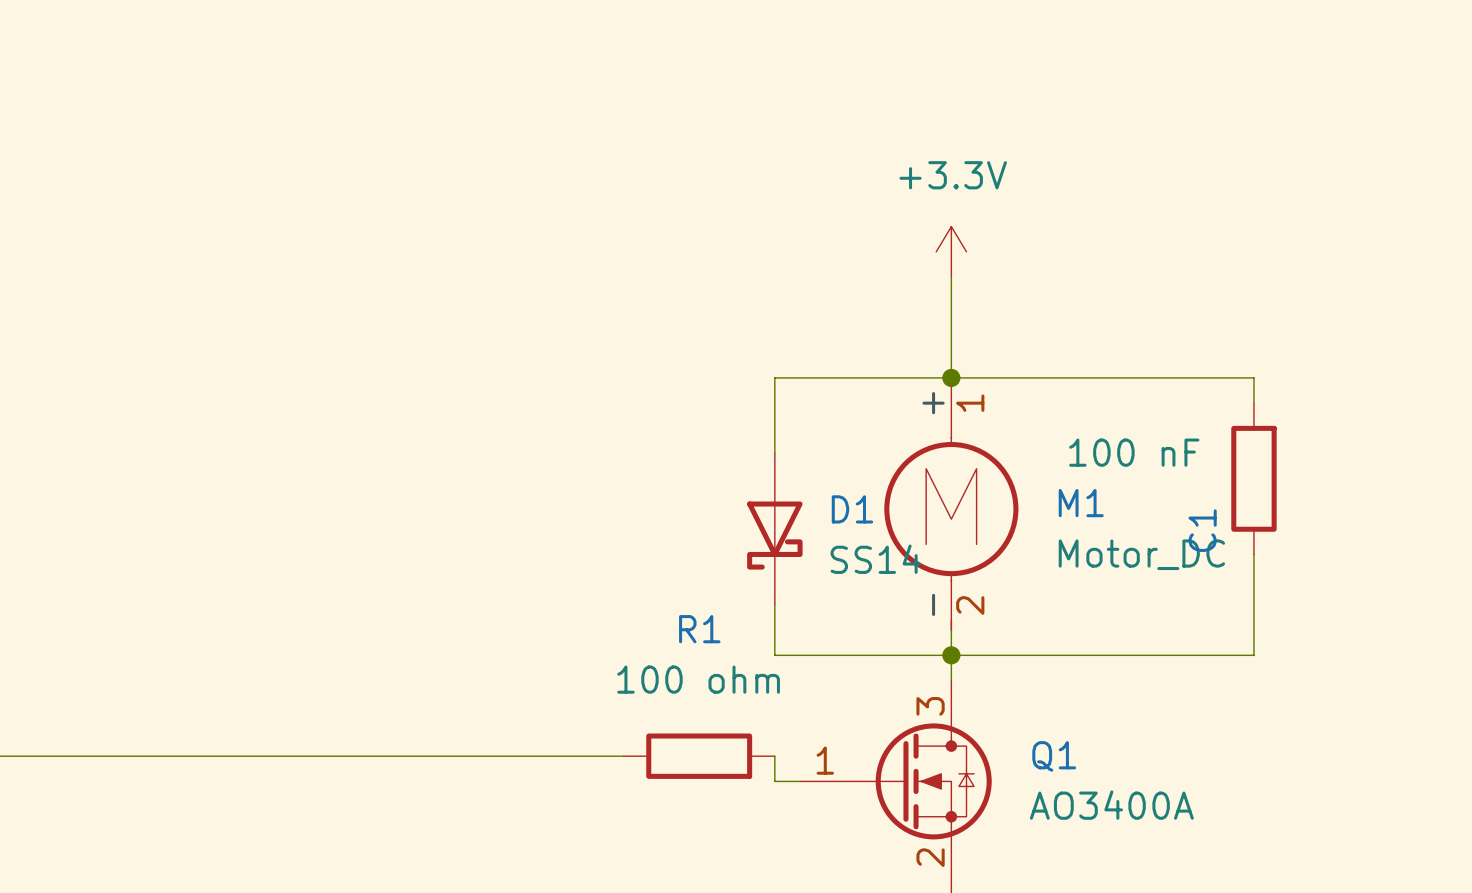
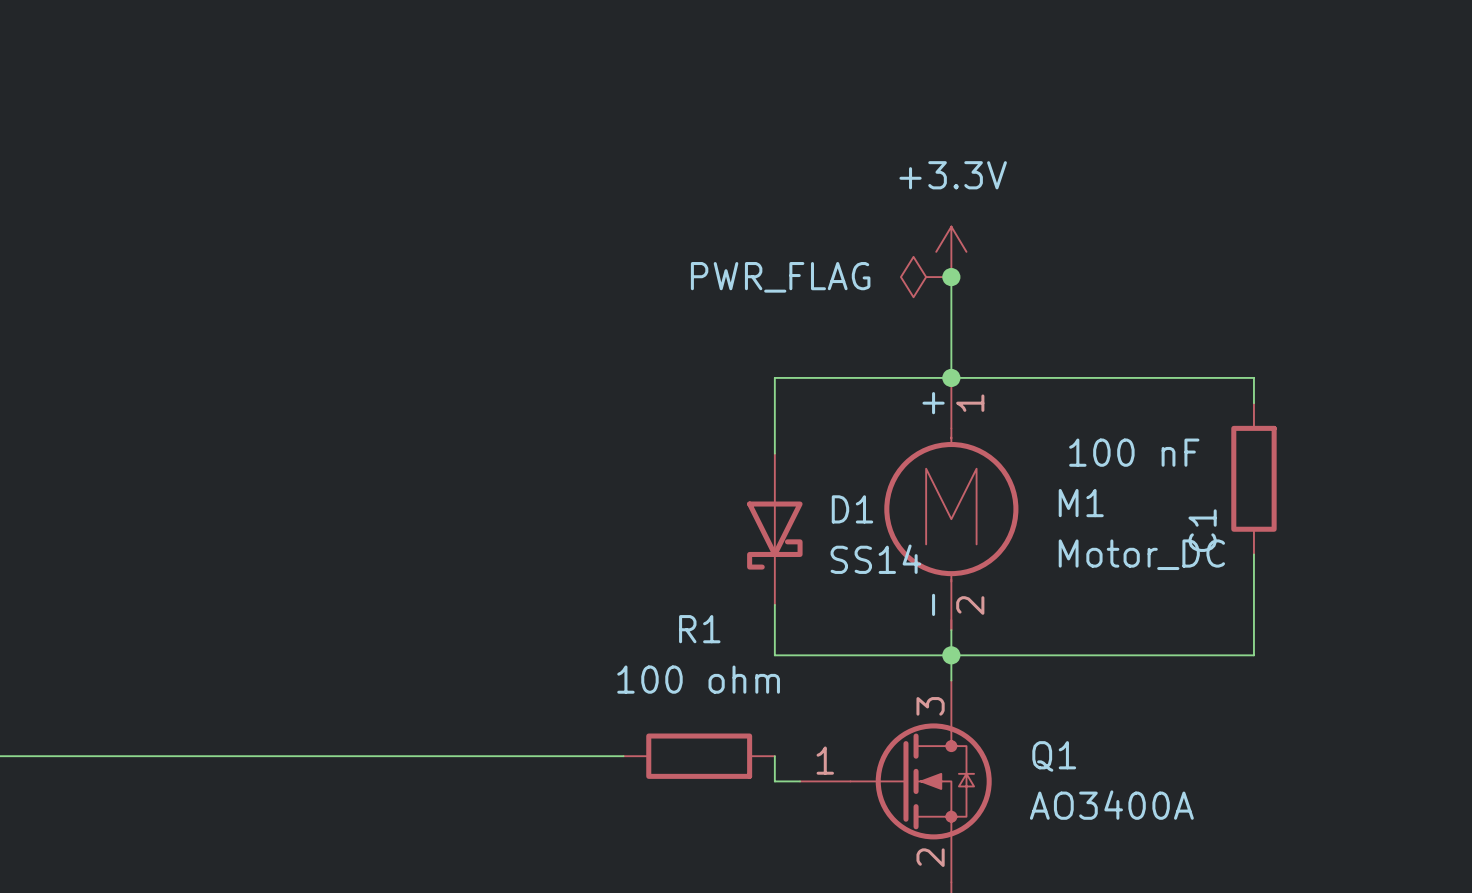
power symbol: none -> PWR_FLAG (926, 277)
junction: none -> (951, 277)

